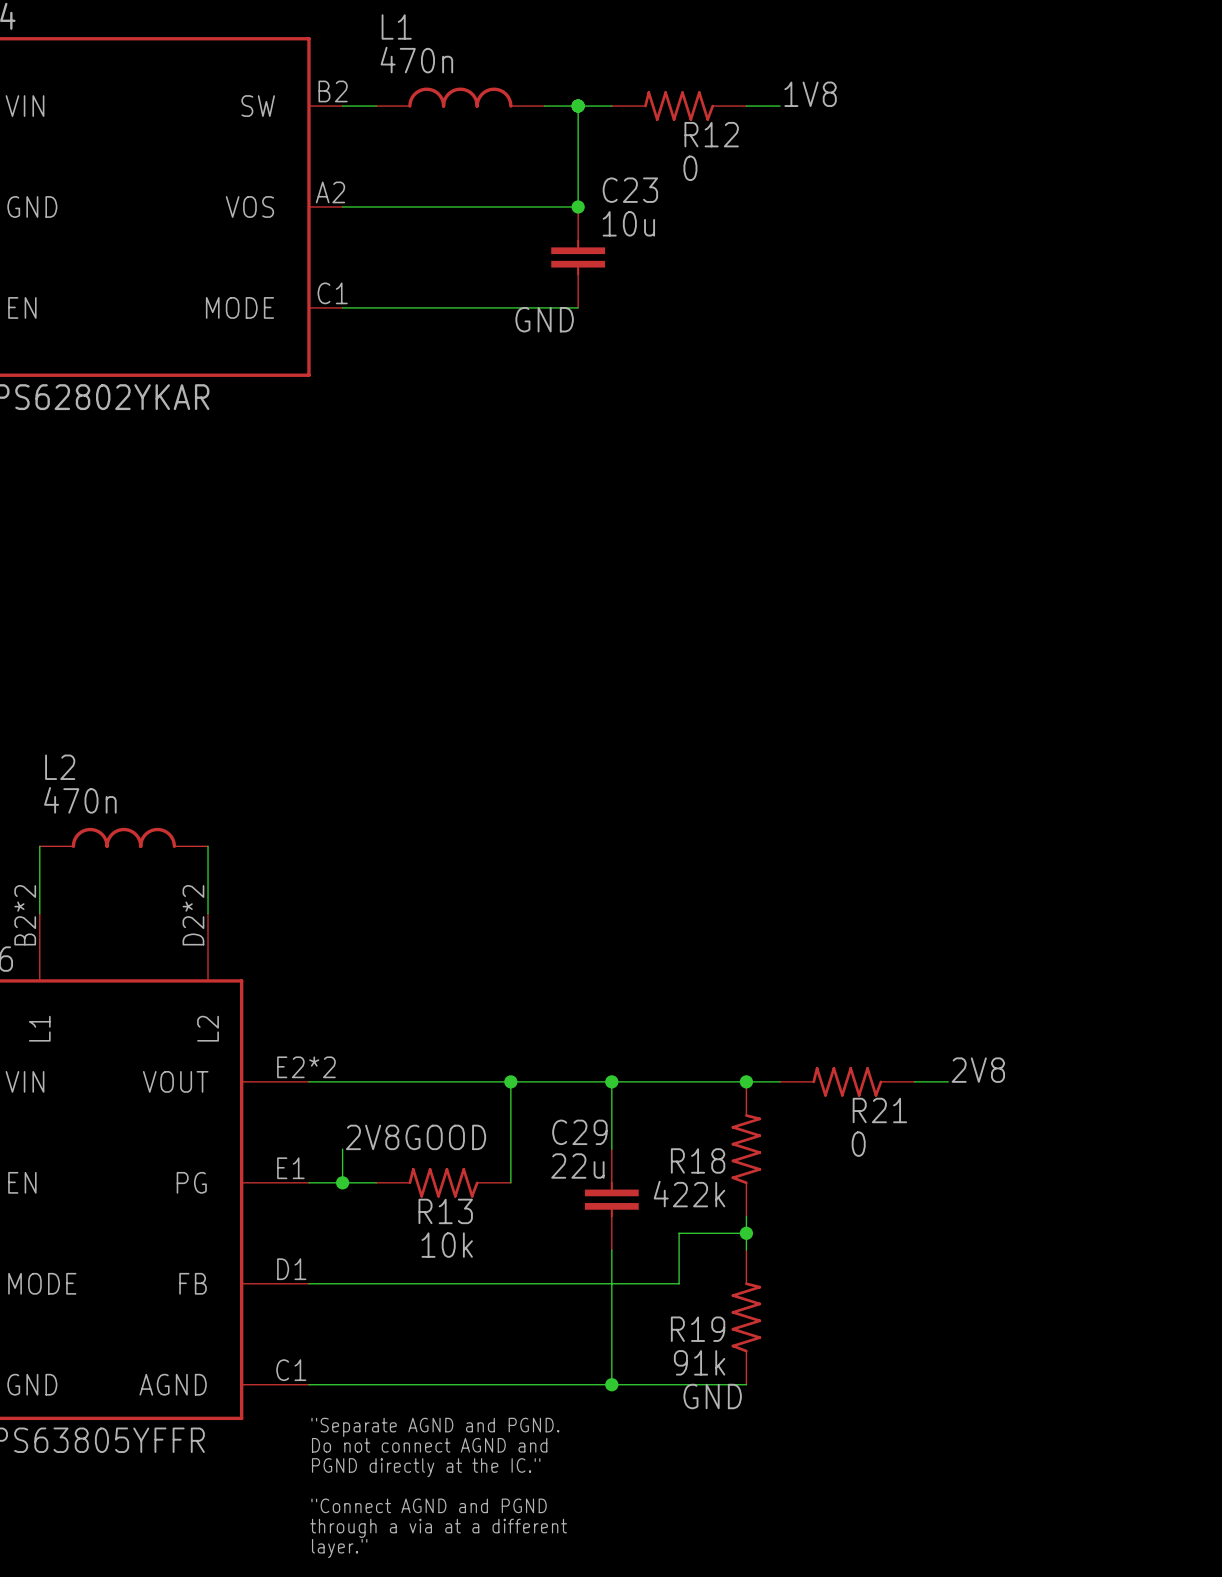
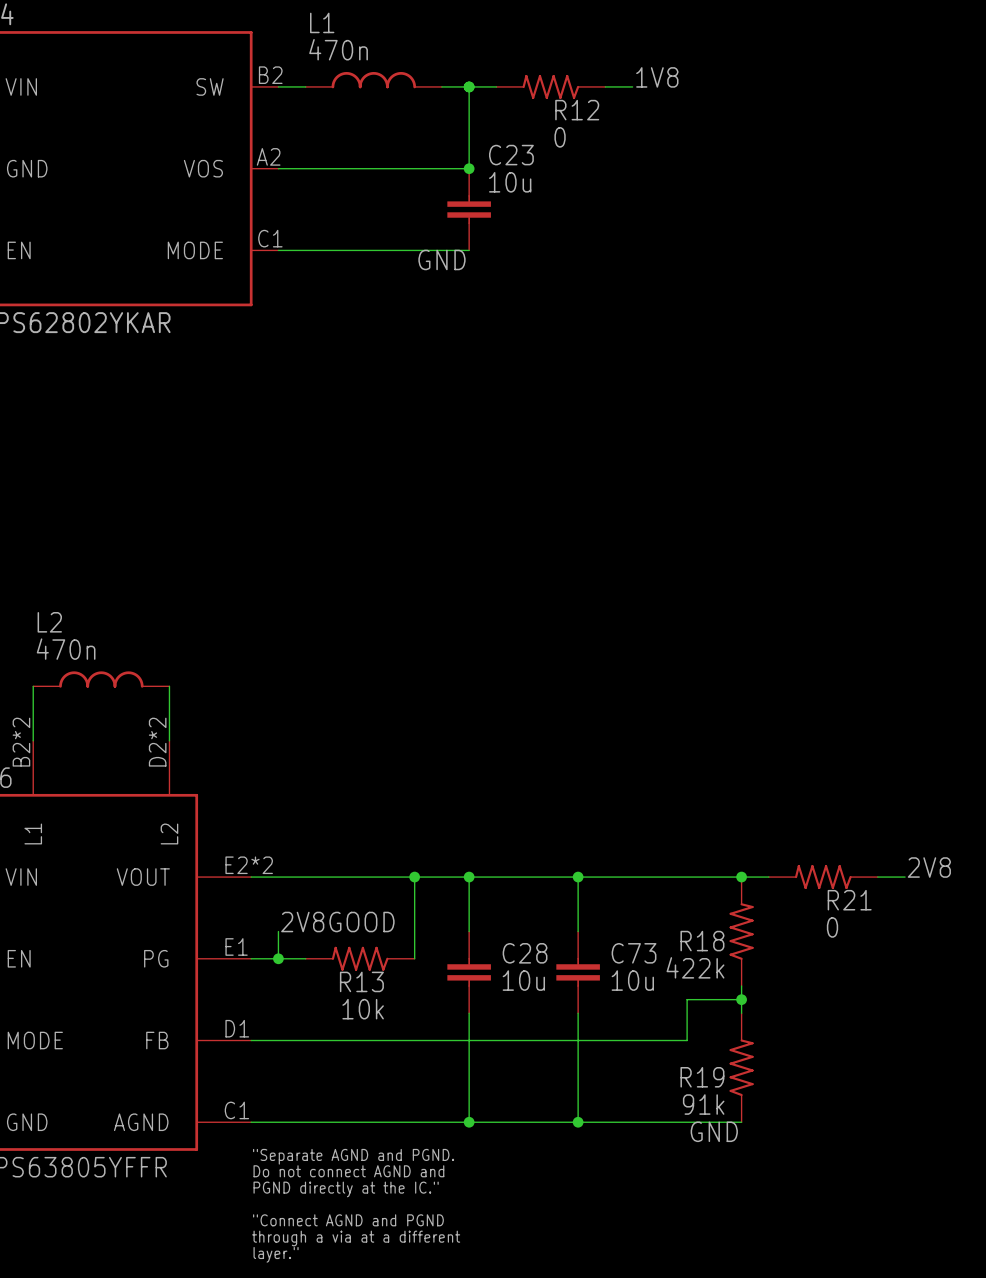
label position: 2V8 (978, 1070) -> 2V8 (929, 867)
wire: (611, 1081) (611, 1149) -> (469, 877) (469, 931)
junction position: (611, 1081) -> (469, 877)
wire: none -> (578, 877) (578, 931)
junction position: (746, 1081) -> (578, 877)
R21 position: (847, 1081) -> (823, 877)
junction: none -> (741, 877)
wire: none -> (877, 877) (905, 877)
R18 position: (746, 1149) -> (741, 931)
C28: none -> 10u (469, 972)
C29: 22u (611, 1199) -> none
C73: none -> 10u (578, 972)
wire: (746, 1216) (746, 1250) -> (741, 986) (741, 1013)
wire: (746, 1233) (679, 1233) (679, 1283) -> (741, 999) (687, 999) (687, 1040) (550, 1040)
junction: (746, 1233) -> none
junction: none -> (741, 999)
wire: (611, 1250) (611, 1384) -> (469, 1013) (469, 1122)
wire: none -> (578, 1013) (578, 1122)
R19 position: (746, 1317) -> (741, 1067)
junction position: (611, 1384) -> (469, 1122)
junction: none -> (578, 1122)
wire: none -> (605, 1122) (741, 1122)
label position: GND (712, 1396) -> GND (714, 1131)

